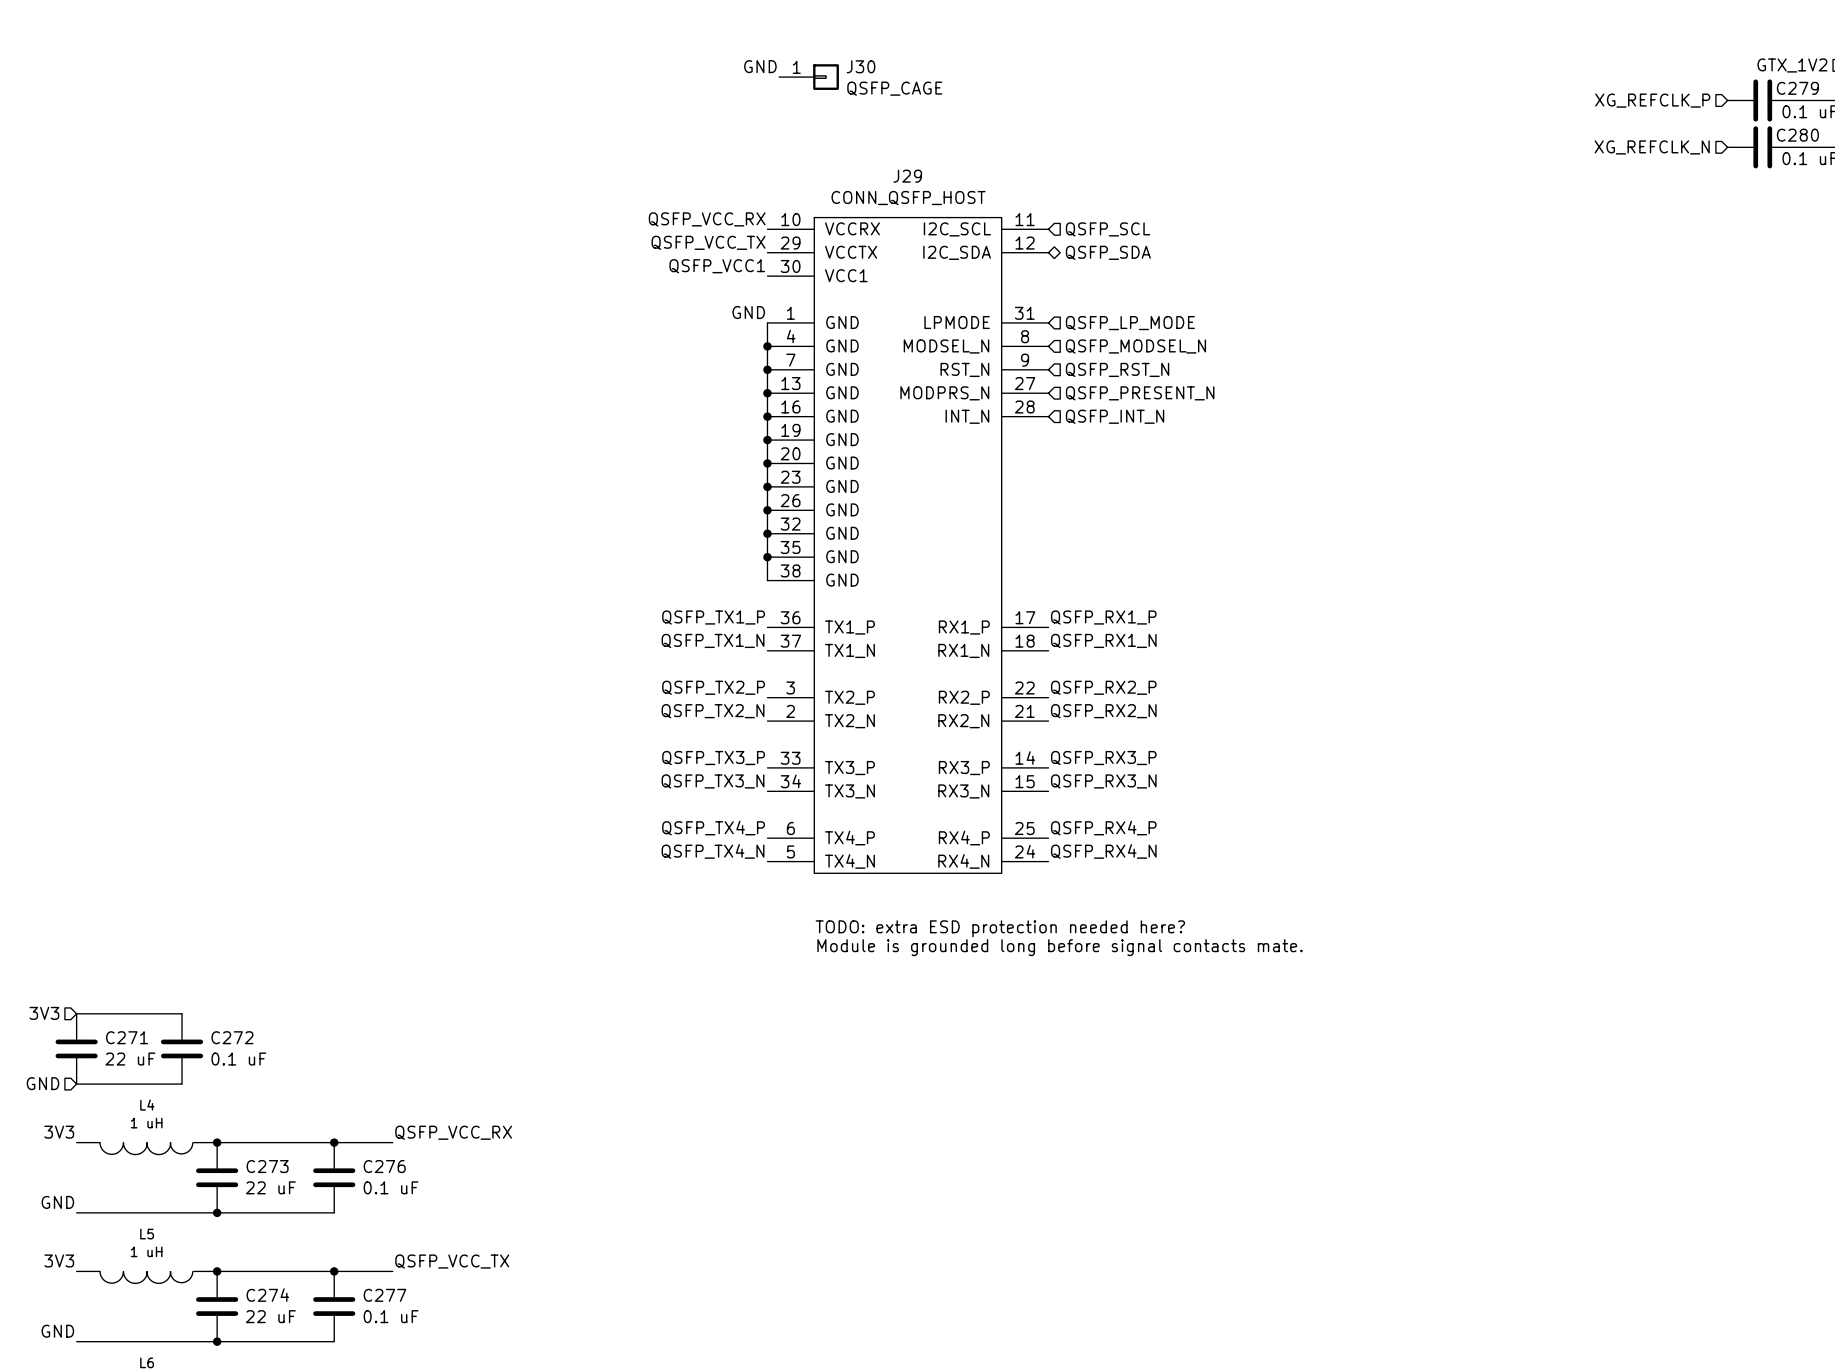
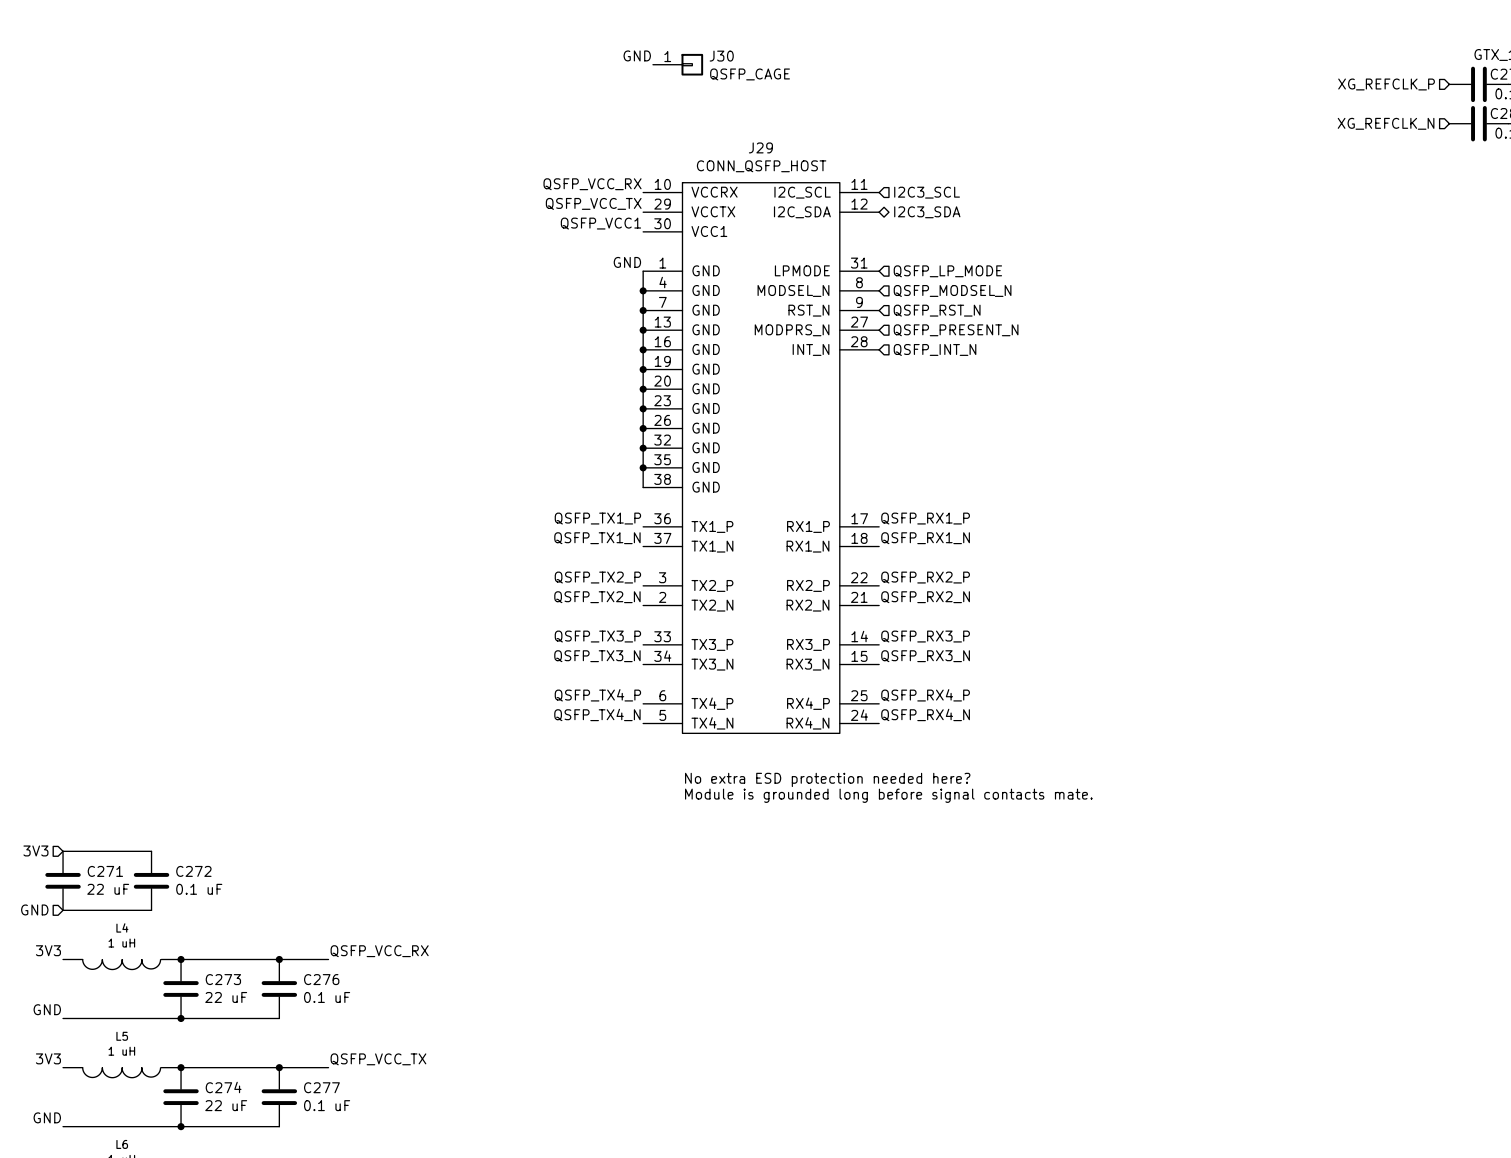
hierarchical label: QSFP_SCL (1108, 229) -> I2C3_SCL (927, 192)
hierarchical label: QSFP_SDA (1108, 252) -> I2C3_SDA (927, 212)
text: TODO: extra ESD protection needed here? (1000, 928) -> No extra ESD protection needed here? (827, 779)

